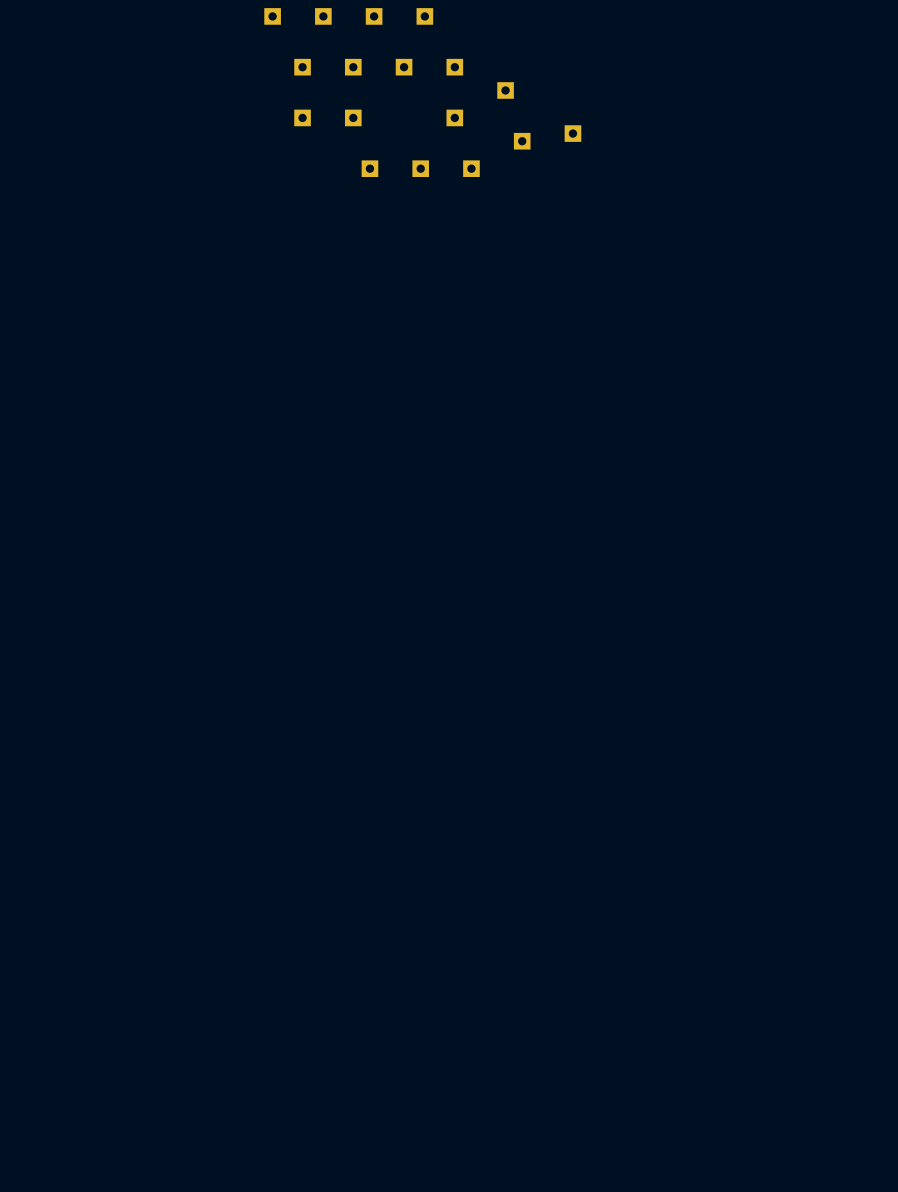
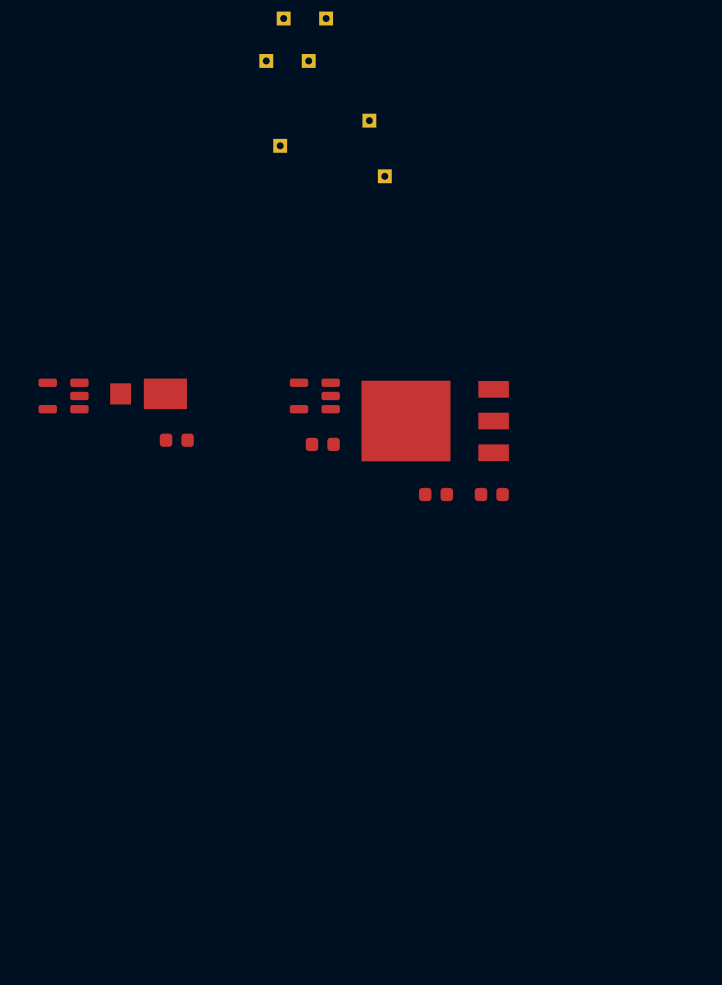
part: (272, 16) -> none
part: (323, 16) -> none
part: (302, 67) -> none
part: (454, 67) -> none
part: (505, 90) -> none
part: (302, 117) -> none
part: (353, 117) -> none
part: (454, 117) -> none
part: (572, 133) -> none
part: none -> (369, 120)
part: (522, 141) -> none
part: (420, 168) -> none
part: (471, 168) -> none
part: none -> (384, 176)
part: none -> (148, 393)
part: none -> (63, 395)
part: none -> (314, 395)
part: none -> (435, 421)
part: none -> (176, 440)
part: none -> (322, 444)
part: none -> (436, 494)
part: none -> (491, 494)

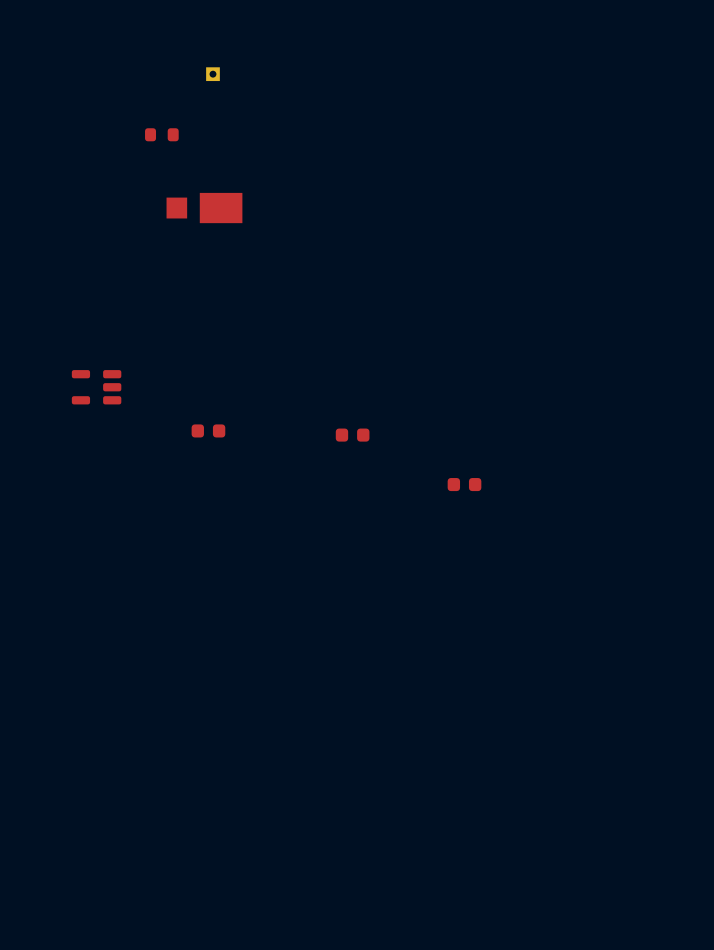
part: (283, 18) -> none
part: (326, 18) -> none
part: (266, 60) -> none
part: (308, 60) -> none
part: none -> (212, 74)
part: (369, 120) -> none
part: none -> (161, 134)
part: (280, 145) -> none
part: (384, 176) -> none
part position: (148, 393) -> (204, 208)
part: (314, 395) -> none
part: (435, 421) -> none
part: (491, 494) -> none

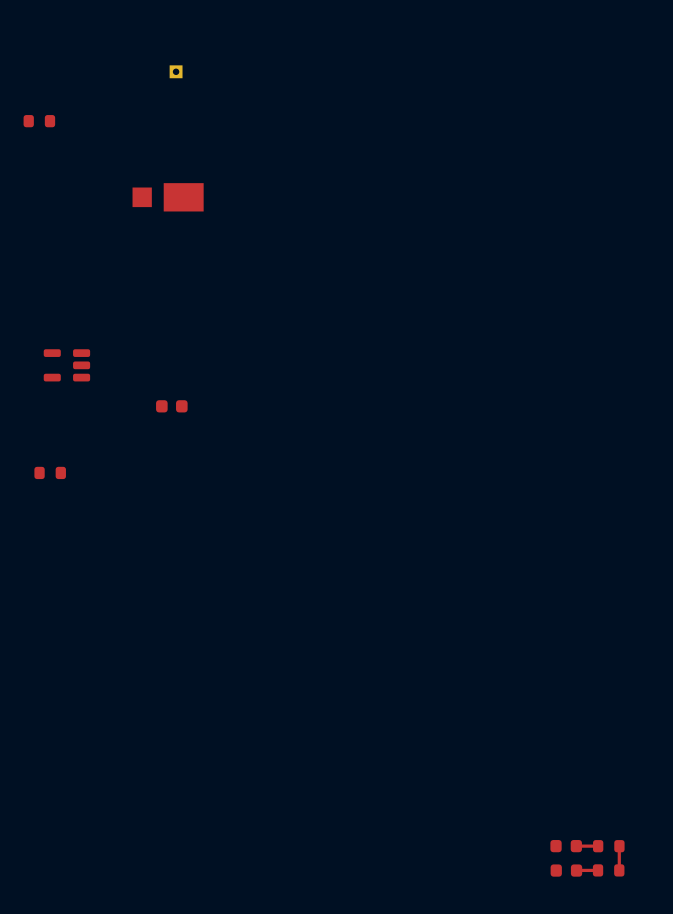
part position: (161, 134) -> (39, 121)
part: (352, 435) -> none
part: (464, 484) -> none
part: none -> (50, 472)
part: none -> (566, 846)
top track: none -> (598, 846) (576, 846)
part: none -> (608, 846)
top track: none -> (619, 846) (619, 870)
top track: none -> (598, 870) (576, 870)
part: none -> (608, 870)
part: none -> (566, 870)

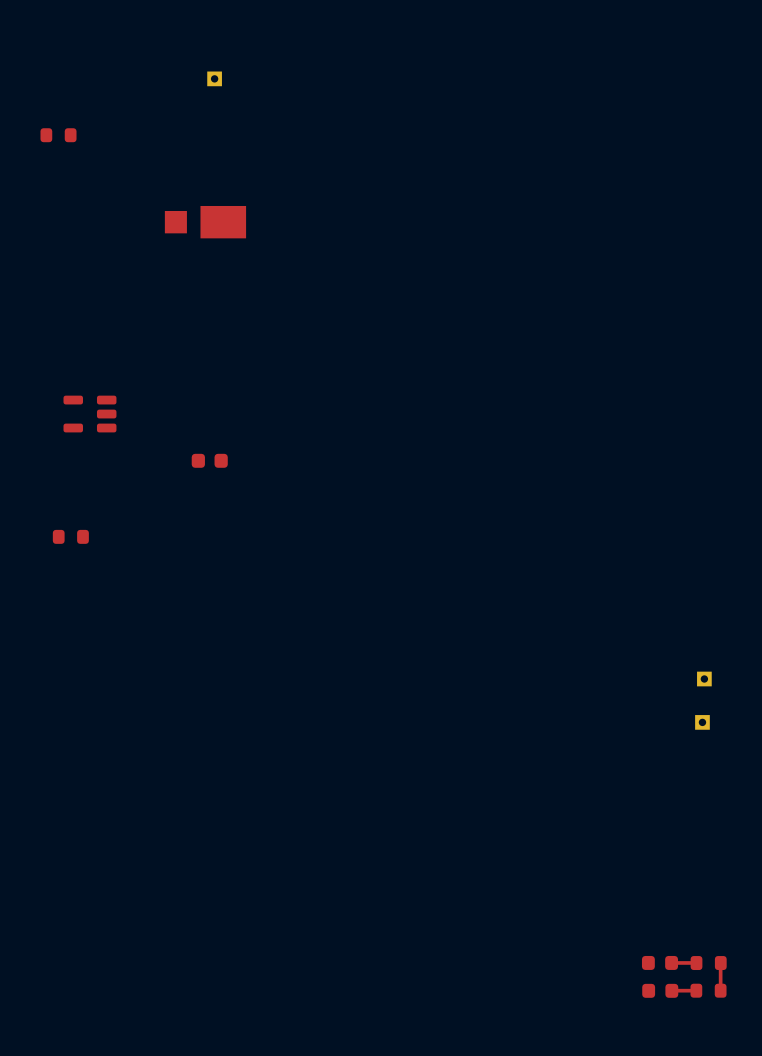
part: none -> (704, 679)
part: none -> (702, 722)

